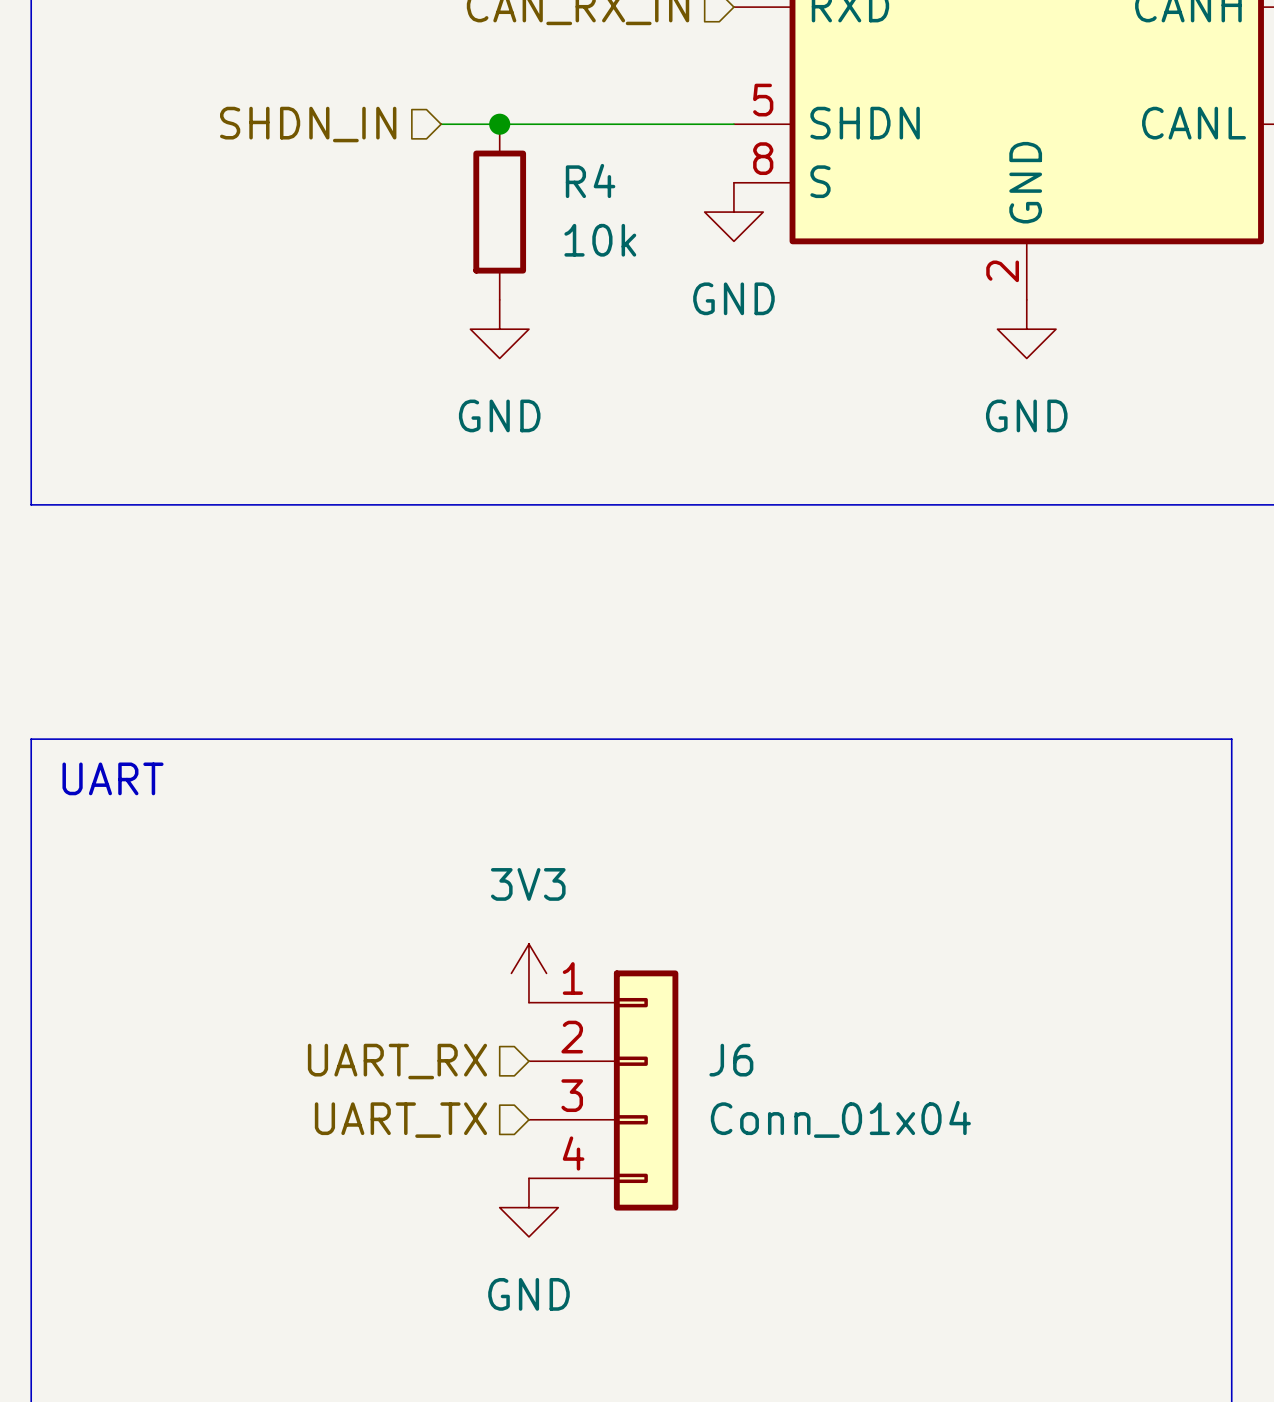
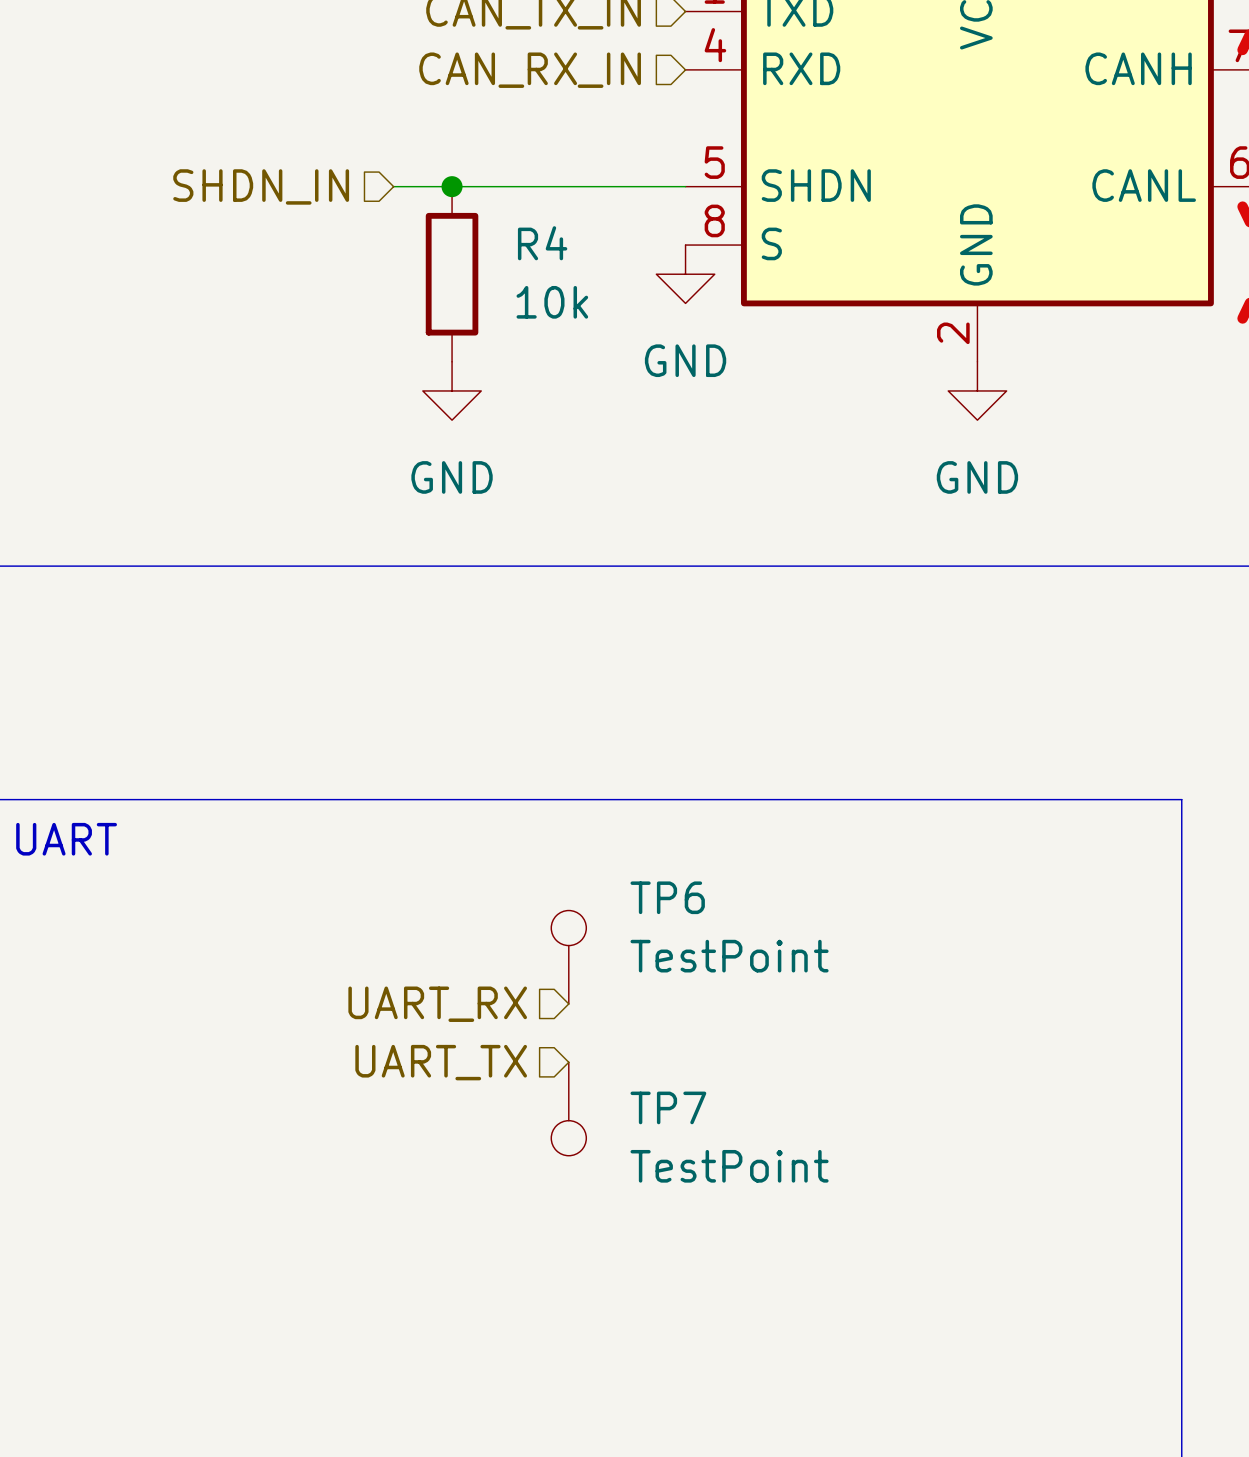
TP6: none -> TestPoint (568, 957)
power symbol: 3V3 (528, 973) -> none
TP7: none -> TestPoint (568, 1109)
hierarchical label position: UART_RX (397, 1061) -> UART_RX (437, 1004)
J6: Conn_01x04 (603, 1090) -> none
hierarchical label position: UART_TX (400, 1120) -> UART_TX (441, 1062)
power symbol: GND (528, 1207) -> none

